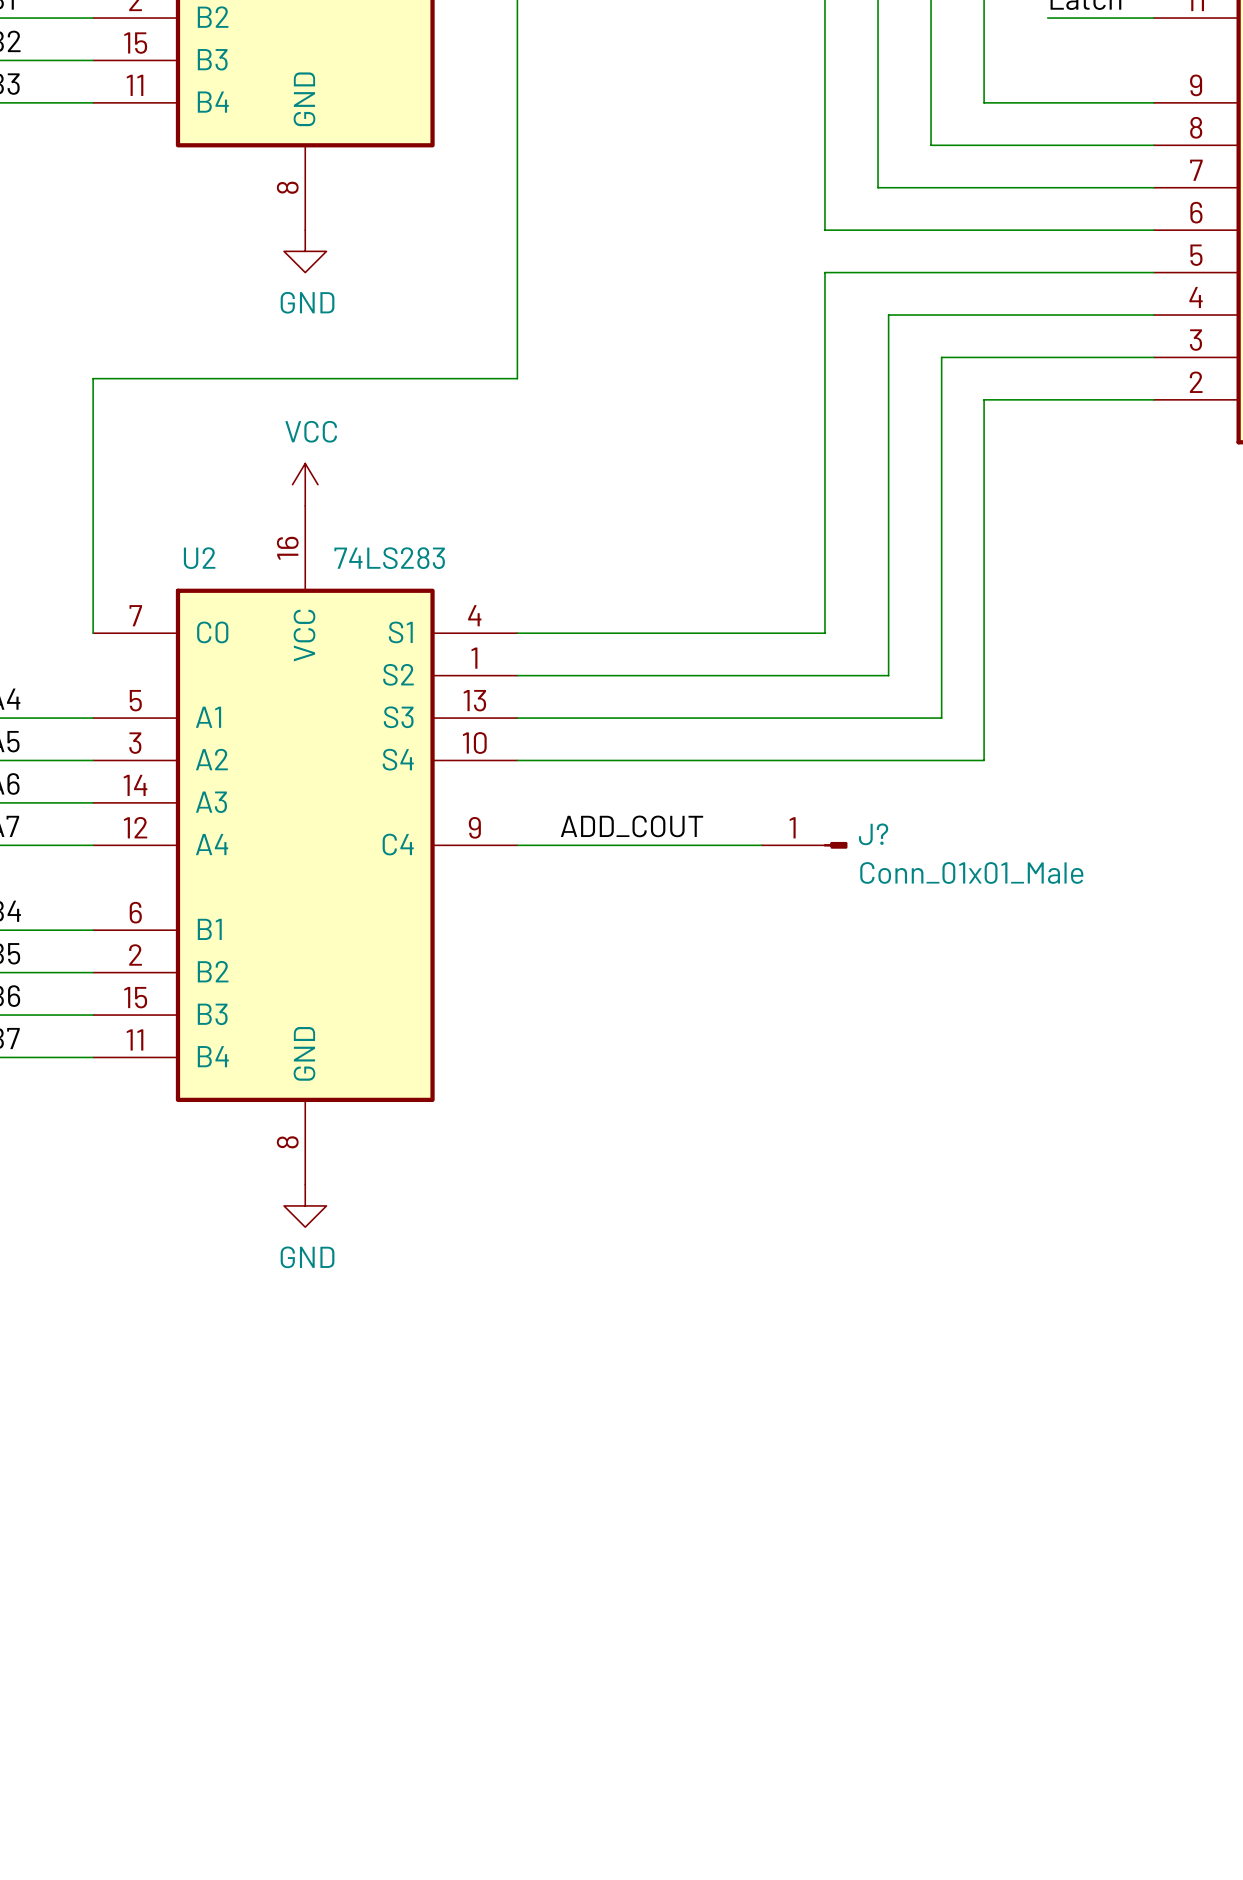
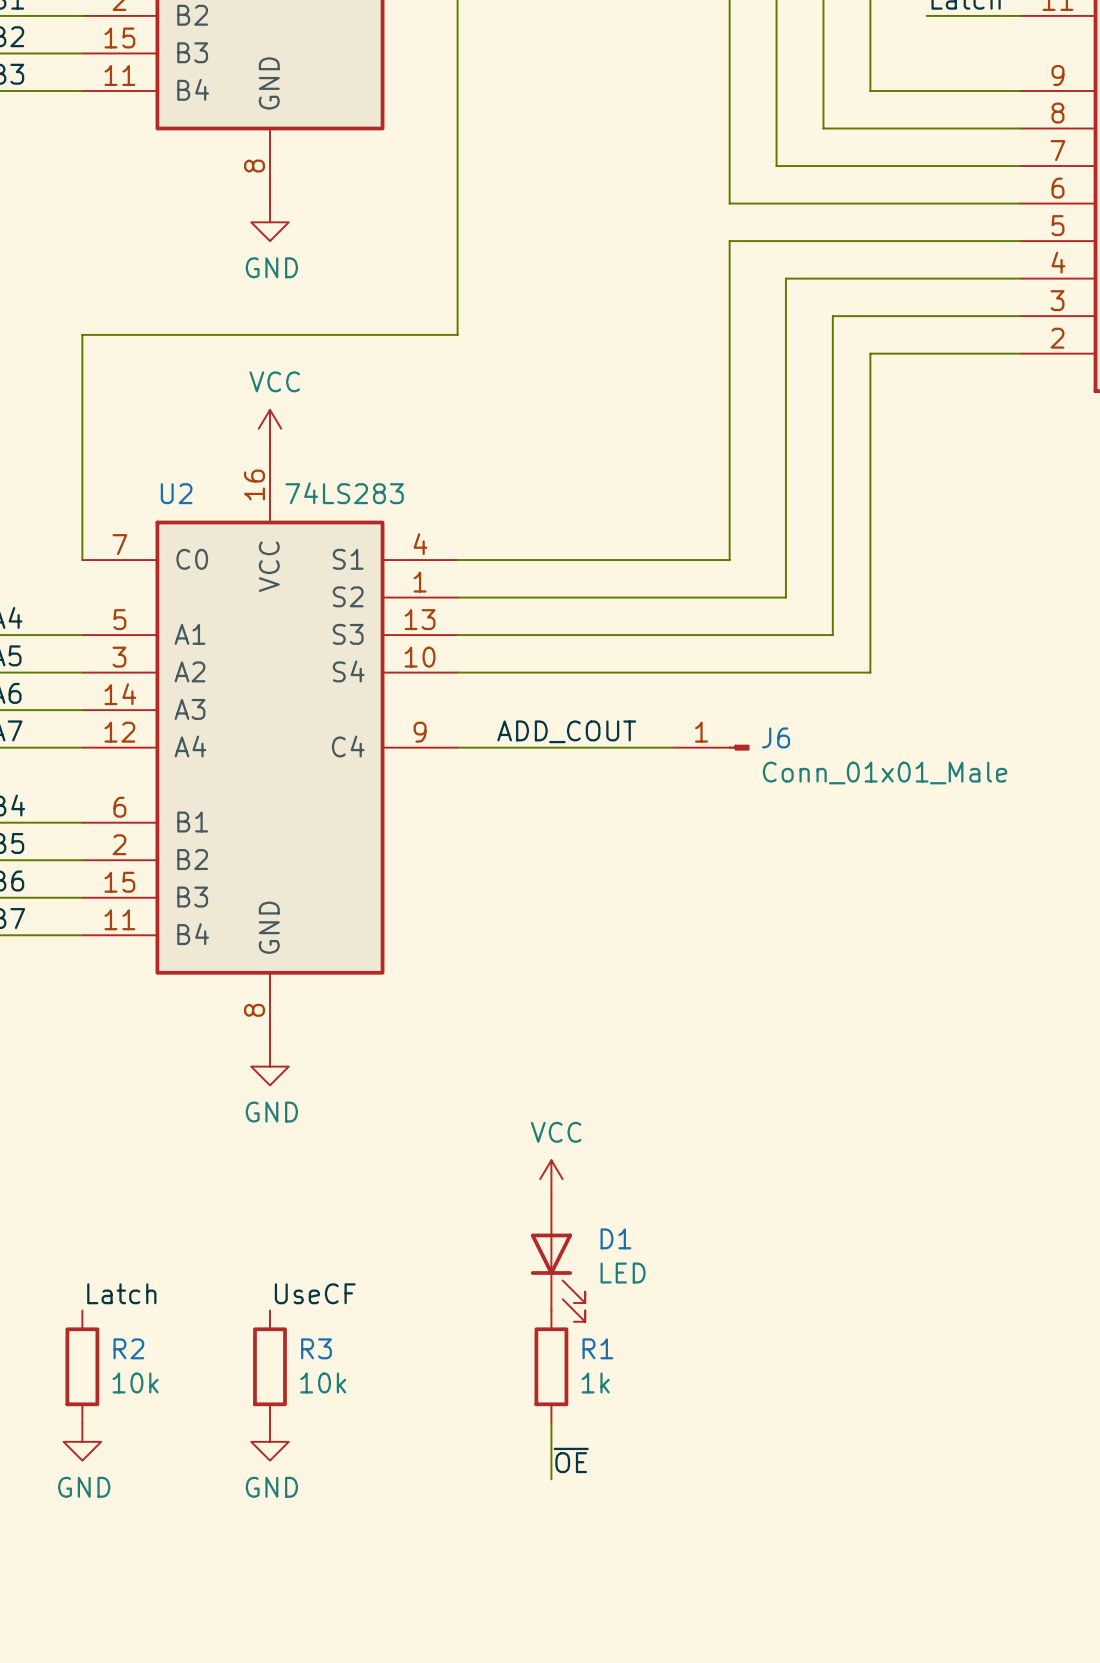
J? name: J? (873, 834) -> J6 (776, 737)
power symbol: none -> VCC (551, 1179)
D1: none -> LED (557, 1259)
label: none -> Latch (121, 1293)
label: none -> UseCF (315, 1293)
R2: none -> 10k (82, 1366)
R3: none -> 10k (269, 1366)
R1: none -> 1k (551, 1366)
wire: none -> (551, 1423) (551, 1479)
power symbol: none -> GND (82, 1441)
power symbol: none -> GND (269, 1441)
label: none -> ~{OE} (571, 1460)

